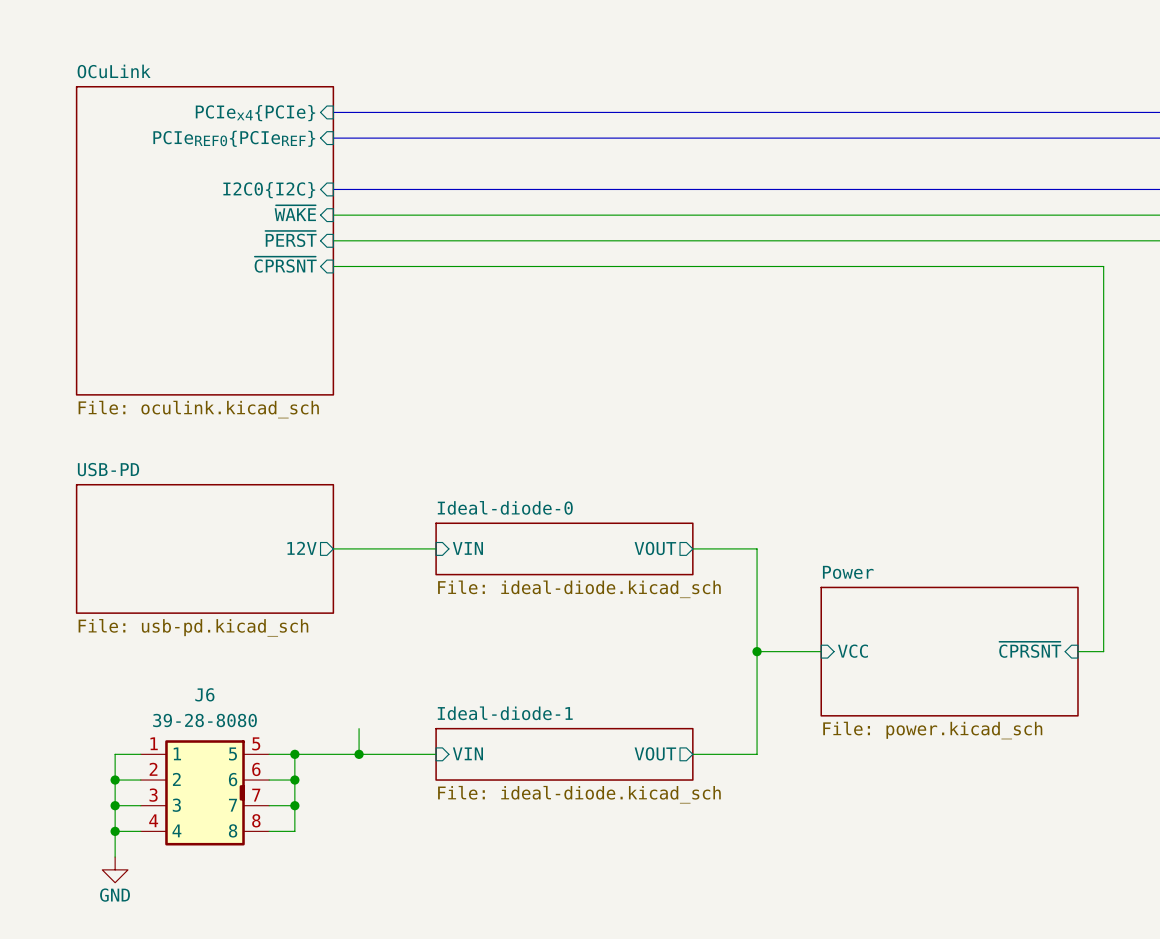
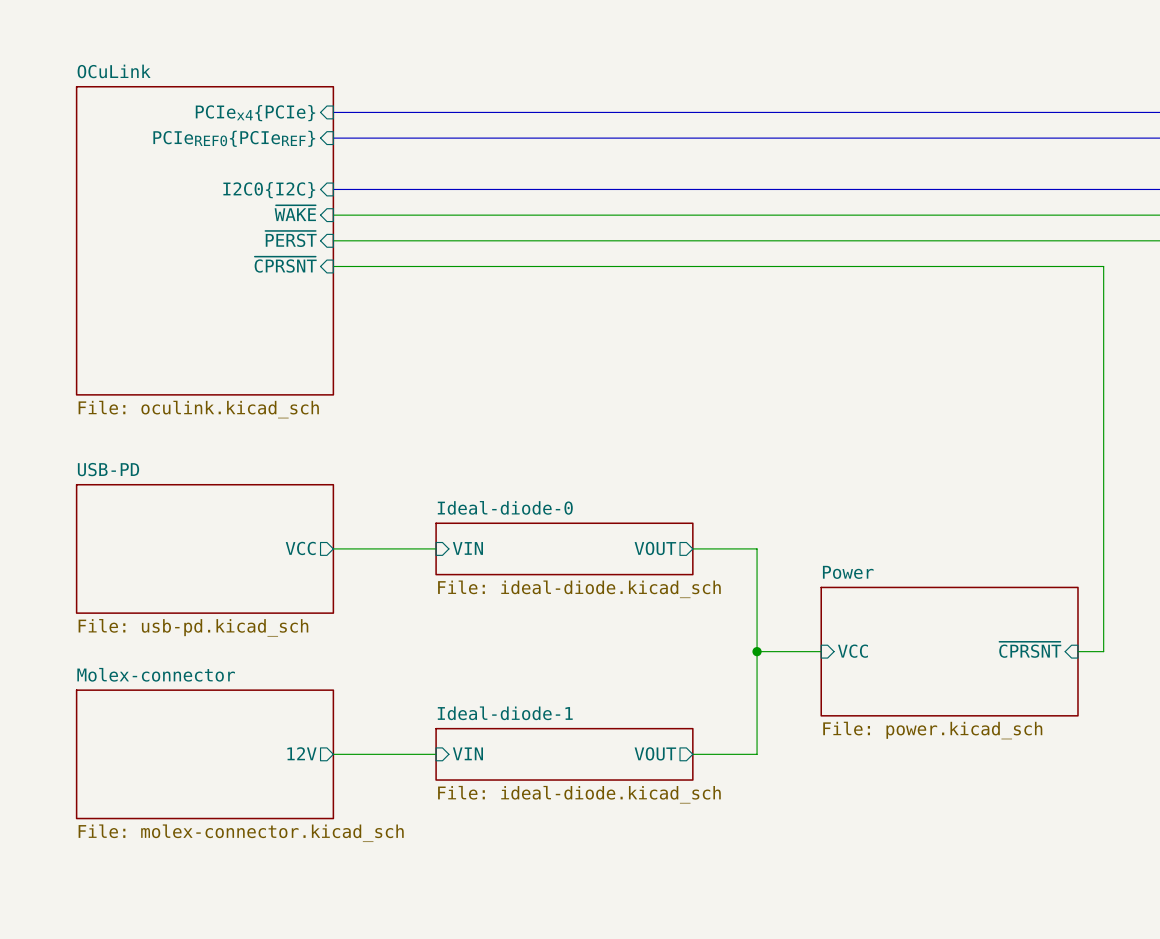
sheet pin: 12V (301, 548) -> VCC (300, 548)
wire: (359, 728) (359, 754) -> none
sheet pin: none -> 12V (301, 753)
wire: (140, 754) (115, 754) (115, 857) -> none
sheet Molex-connector: none -> File: molex-connector.kicad_sch (204, 754)
wire: (269, 754) (333, 754) -> none
wire: (294, 754) (294, 831) (269, 831) -> none
junction: (294, 754) -> none
junction: (359, 754) -> none
wire: (115, 780) (140, 780) -> none
junction: (115, 780) -> none
wire: (269, 780) (294, 780) -> none
junction: (294, 780) -> none
J6: (204, 792) -> none
wire: (115, 805) (140, 805) -> none
junction: (115, 805) -> none
wire: (269, 805) (294, 805) -> none
junction: (294, 805) -> none
wire: (115, 831) (140, 831) -> none
junction: (115, 831) -> none
power symbol: GND (115, 869) -> none

